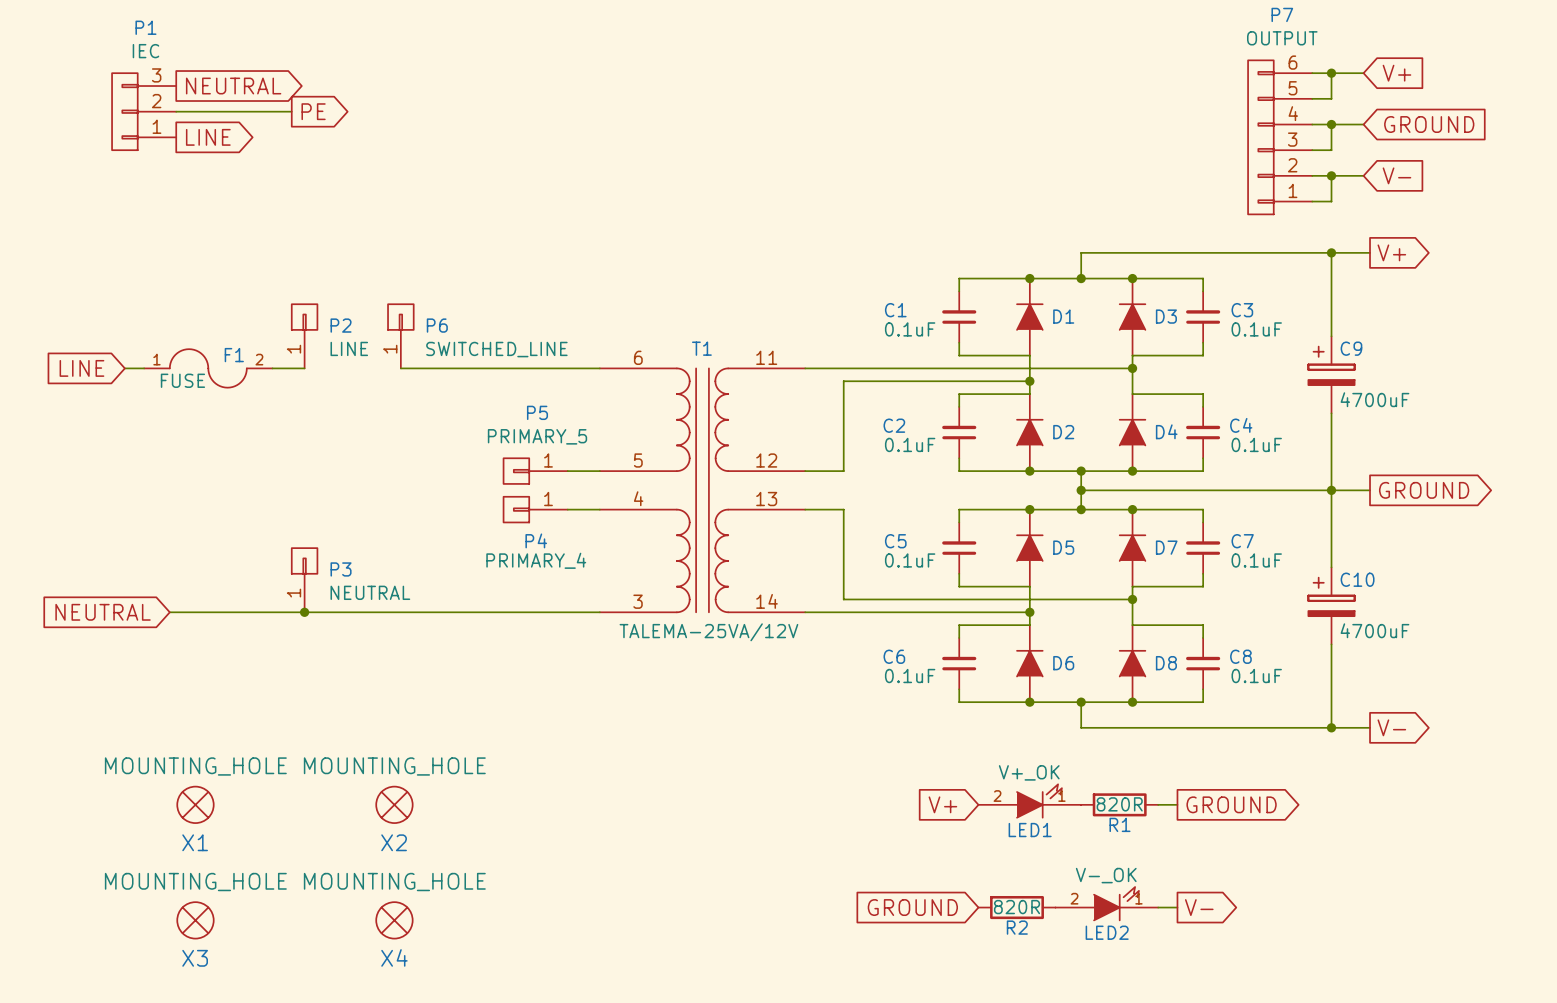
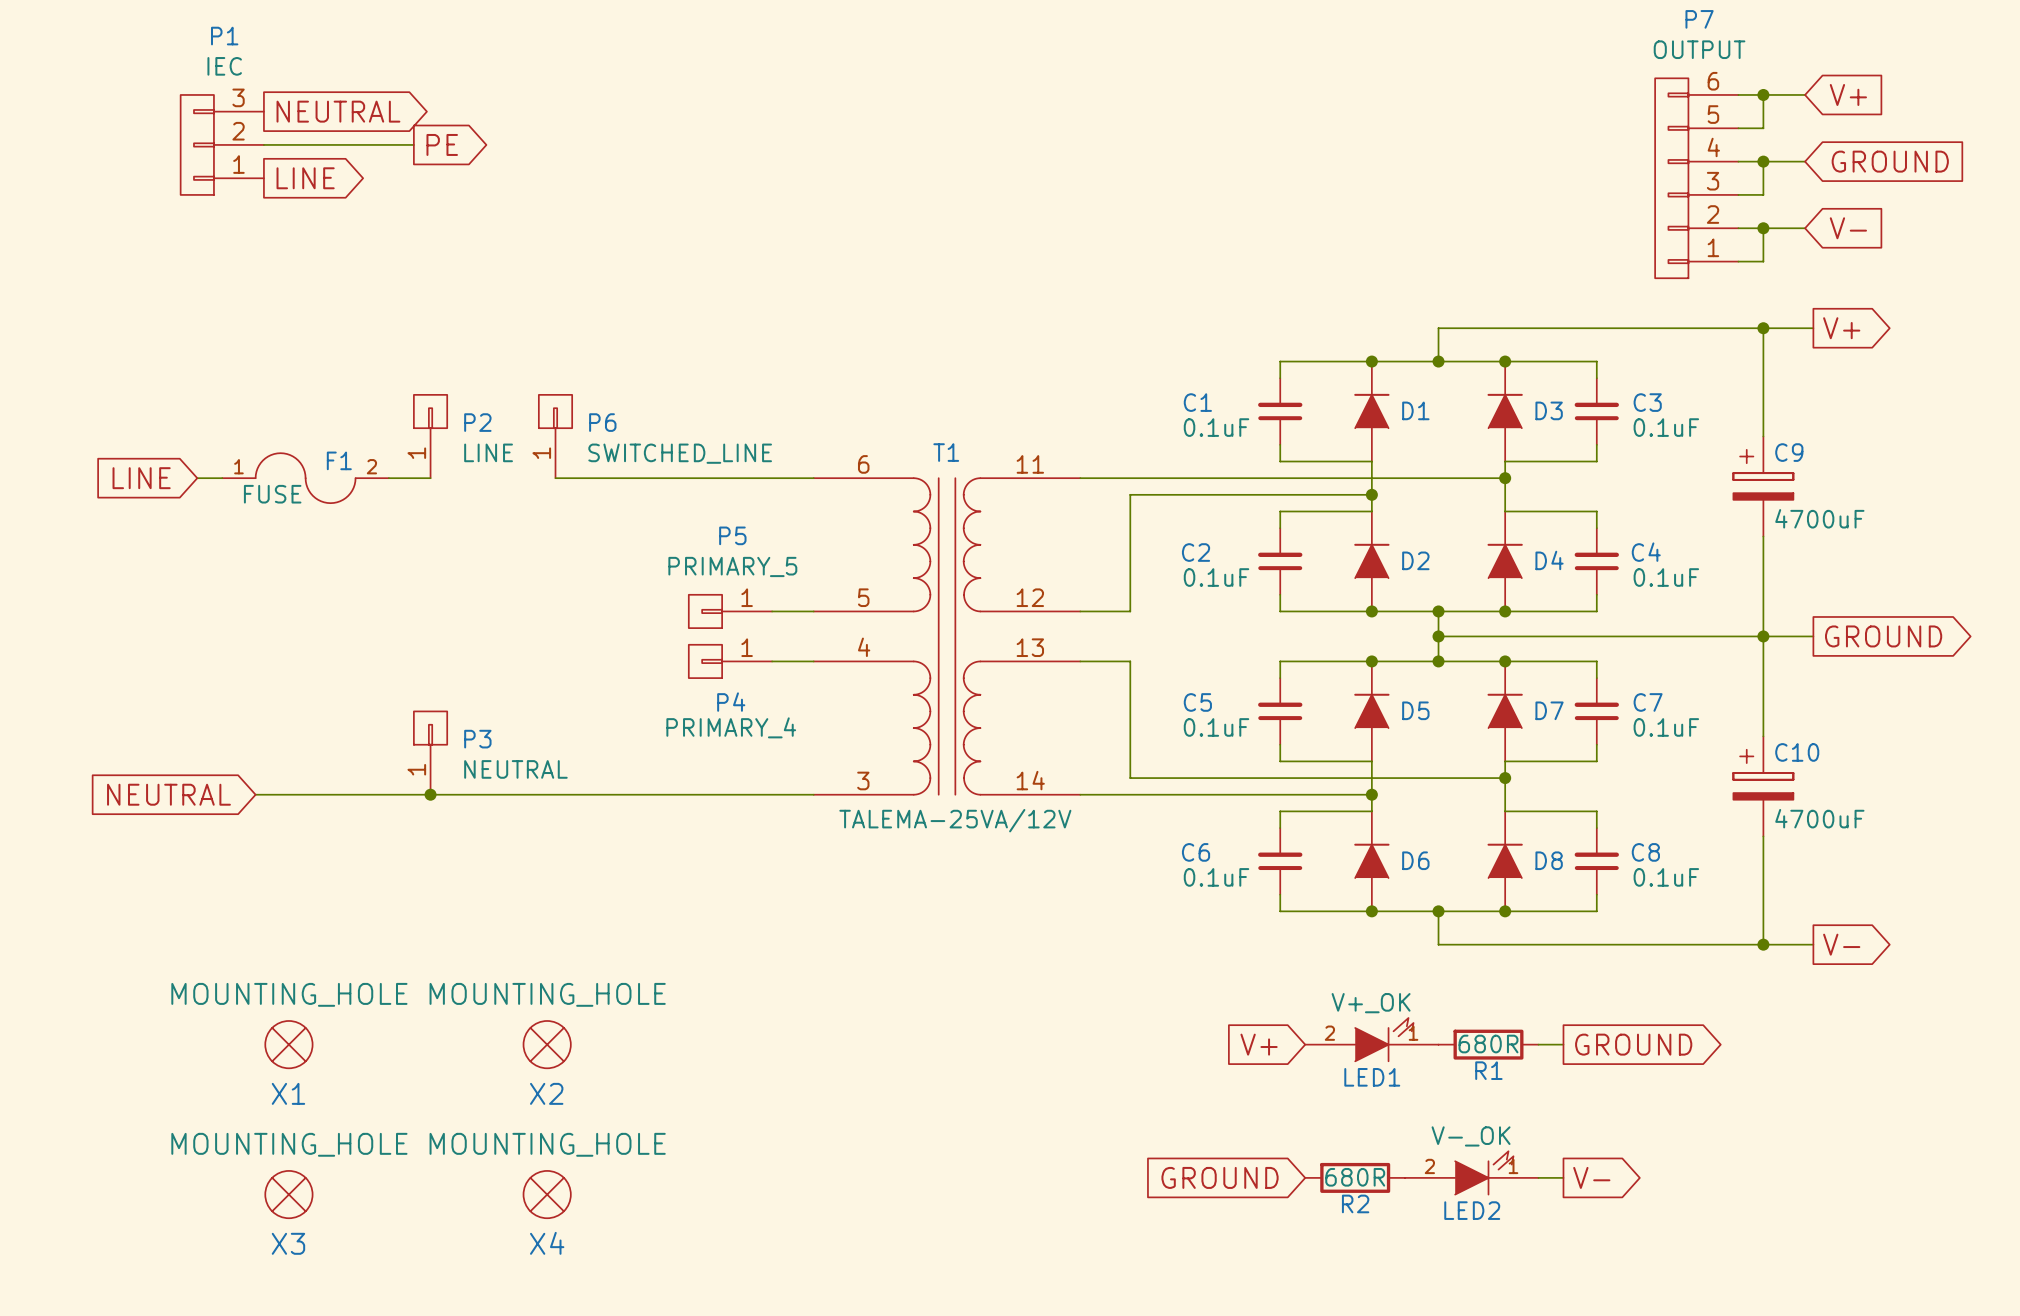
R1 value: 820R (1119, 804) -> 680R (1488, 1044)
R2 value: 820R (1017, 907) -> 680R (1355, 1177)

